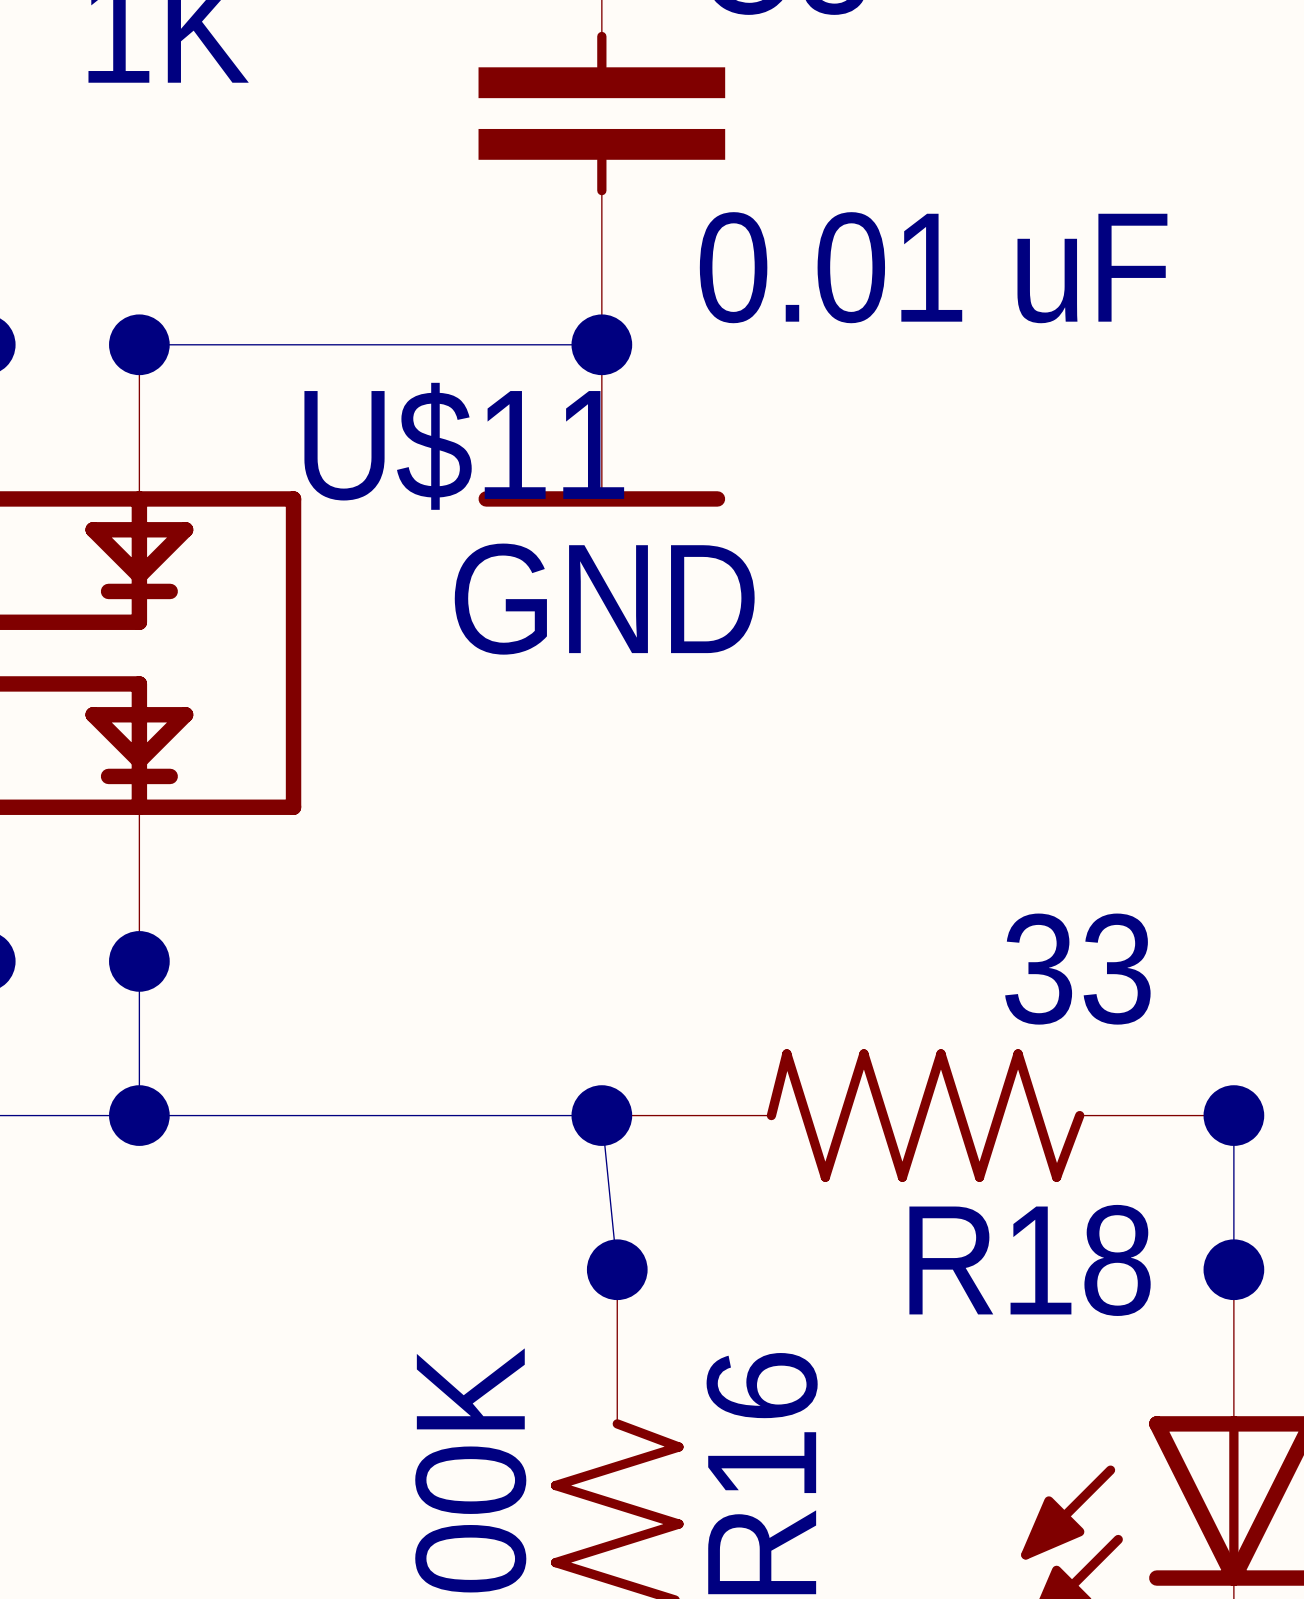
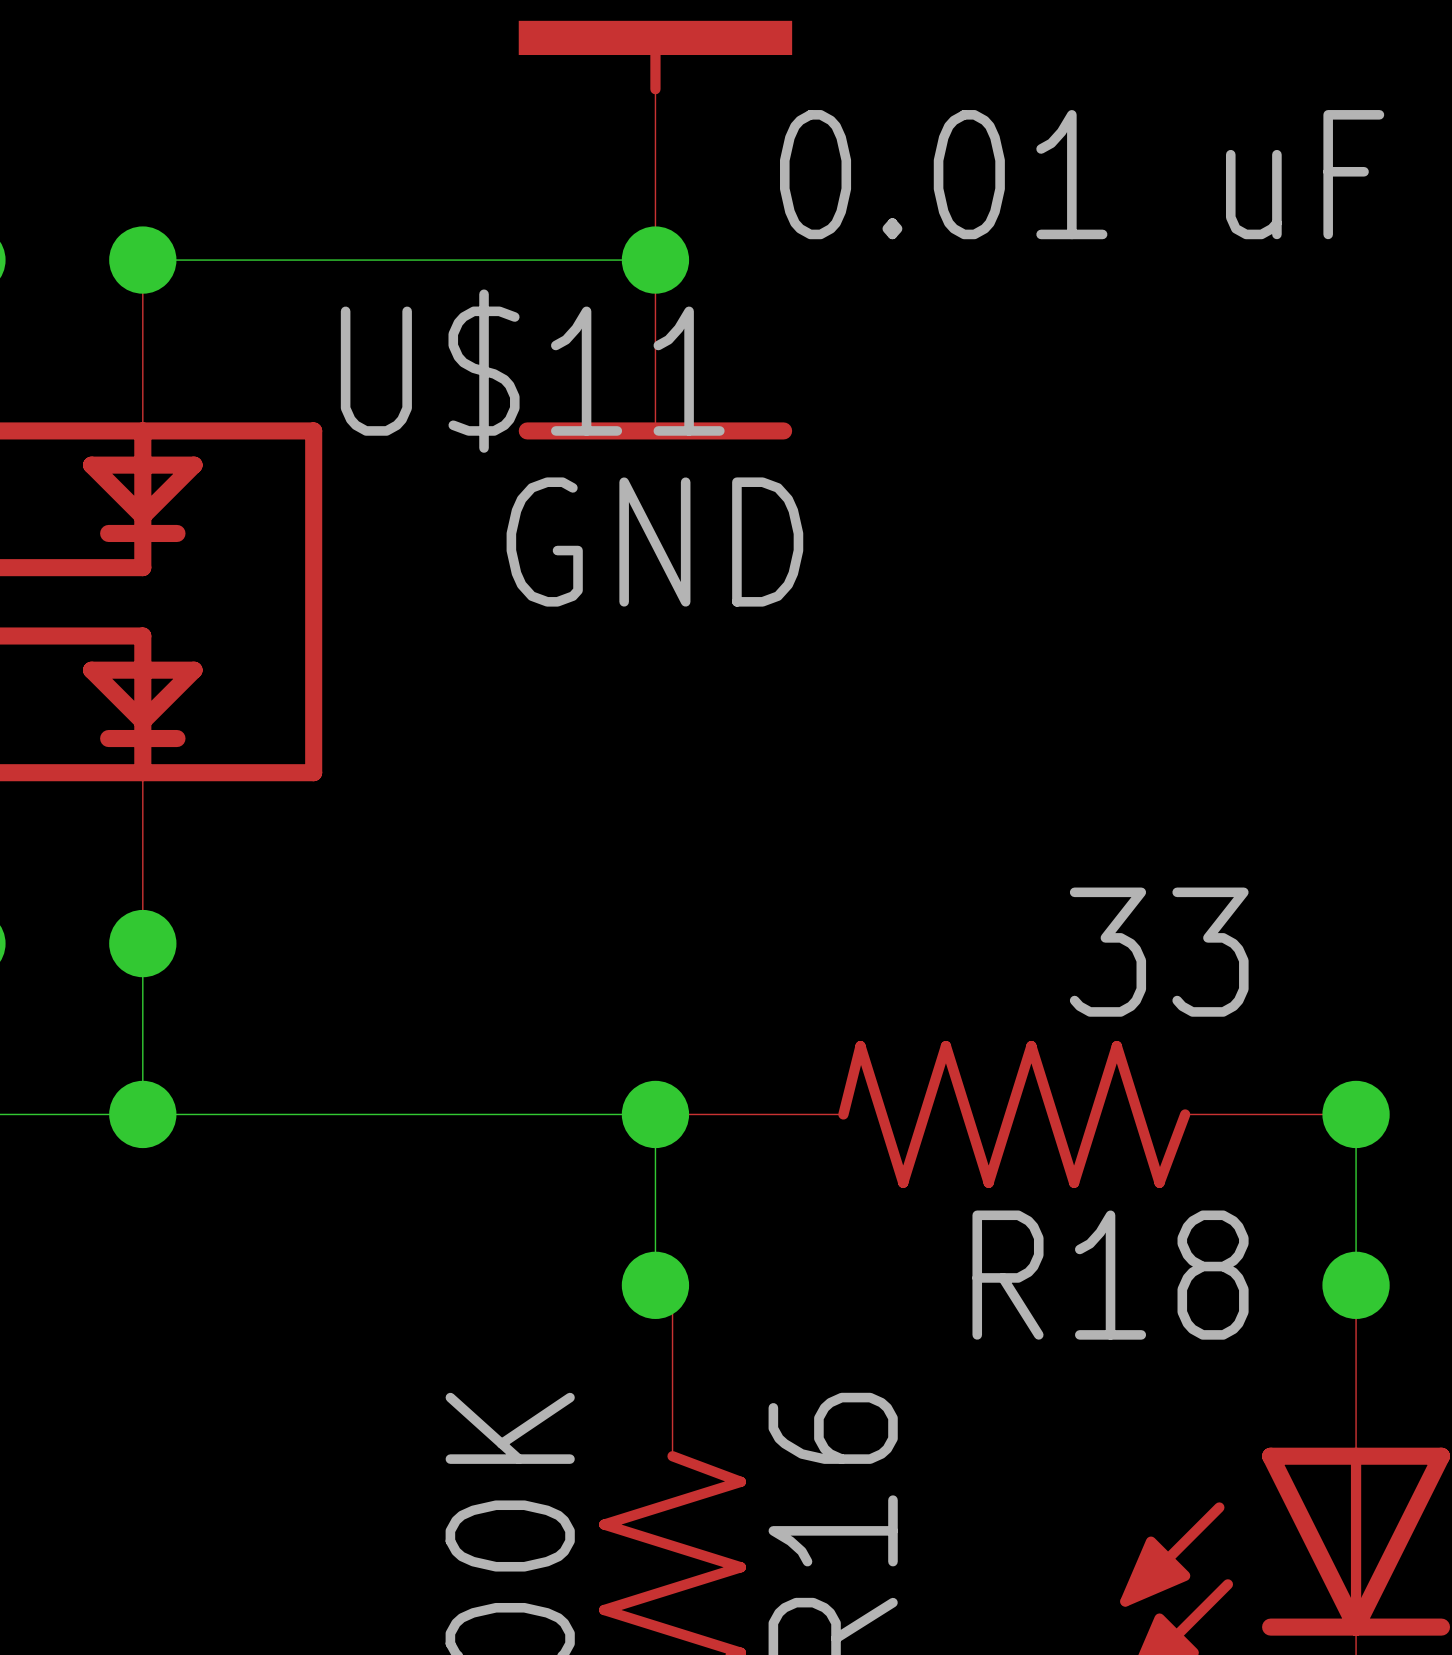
wire: (601, 1115) (617, 1269) -> (655, 1114) (655, 1285)
junction position: (617, 1269) -> (655, 1285)

